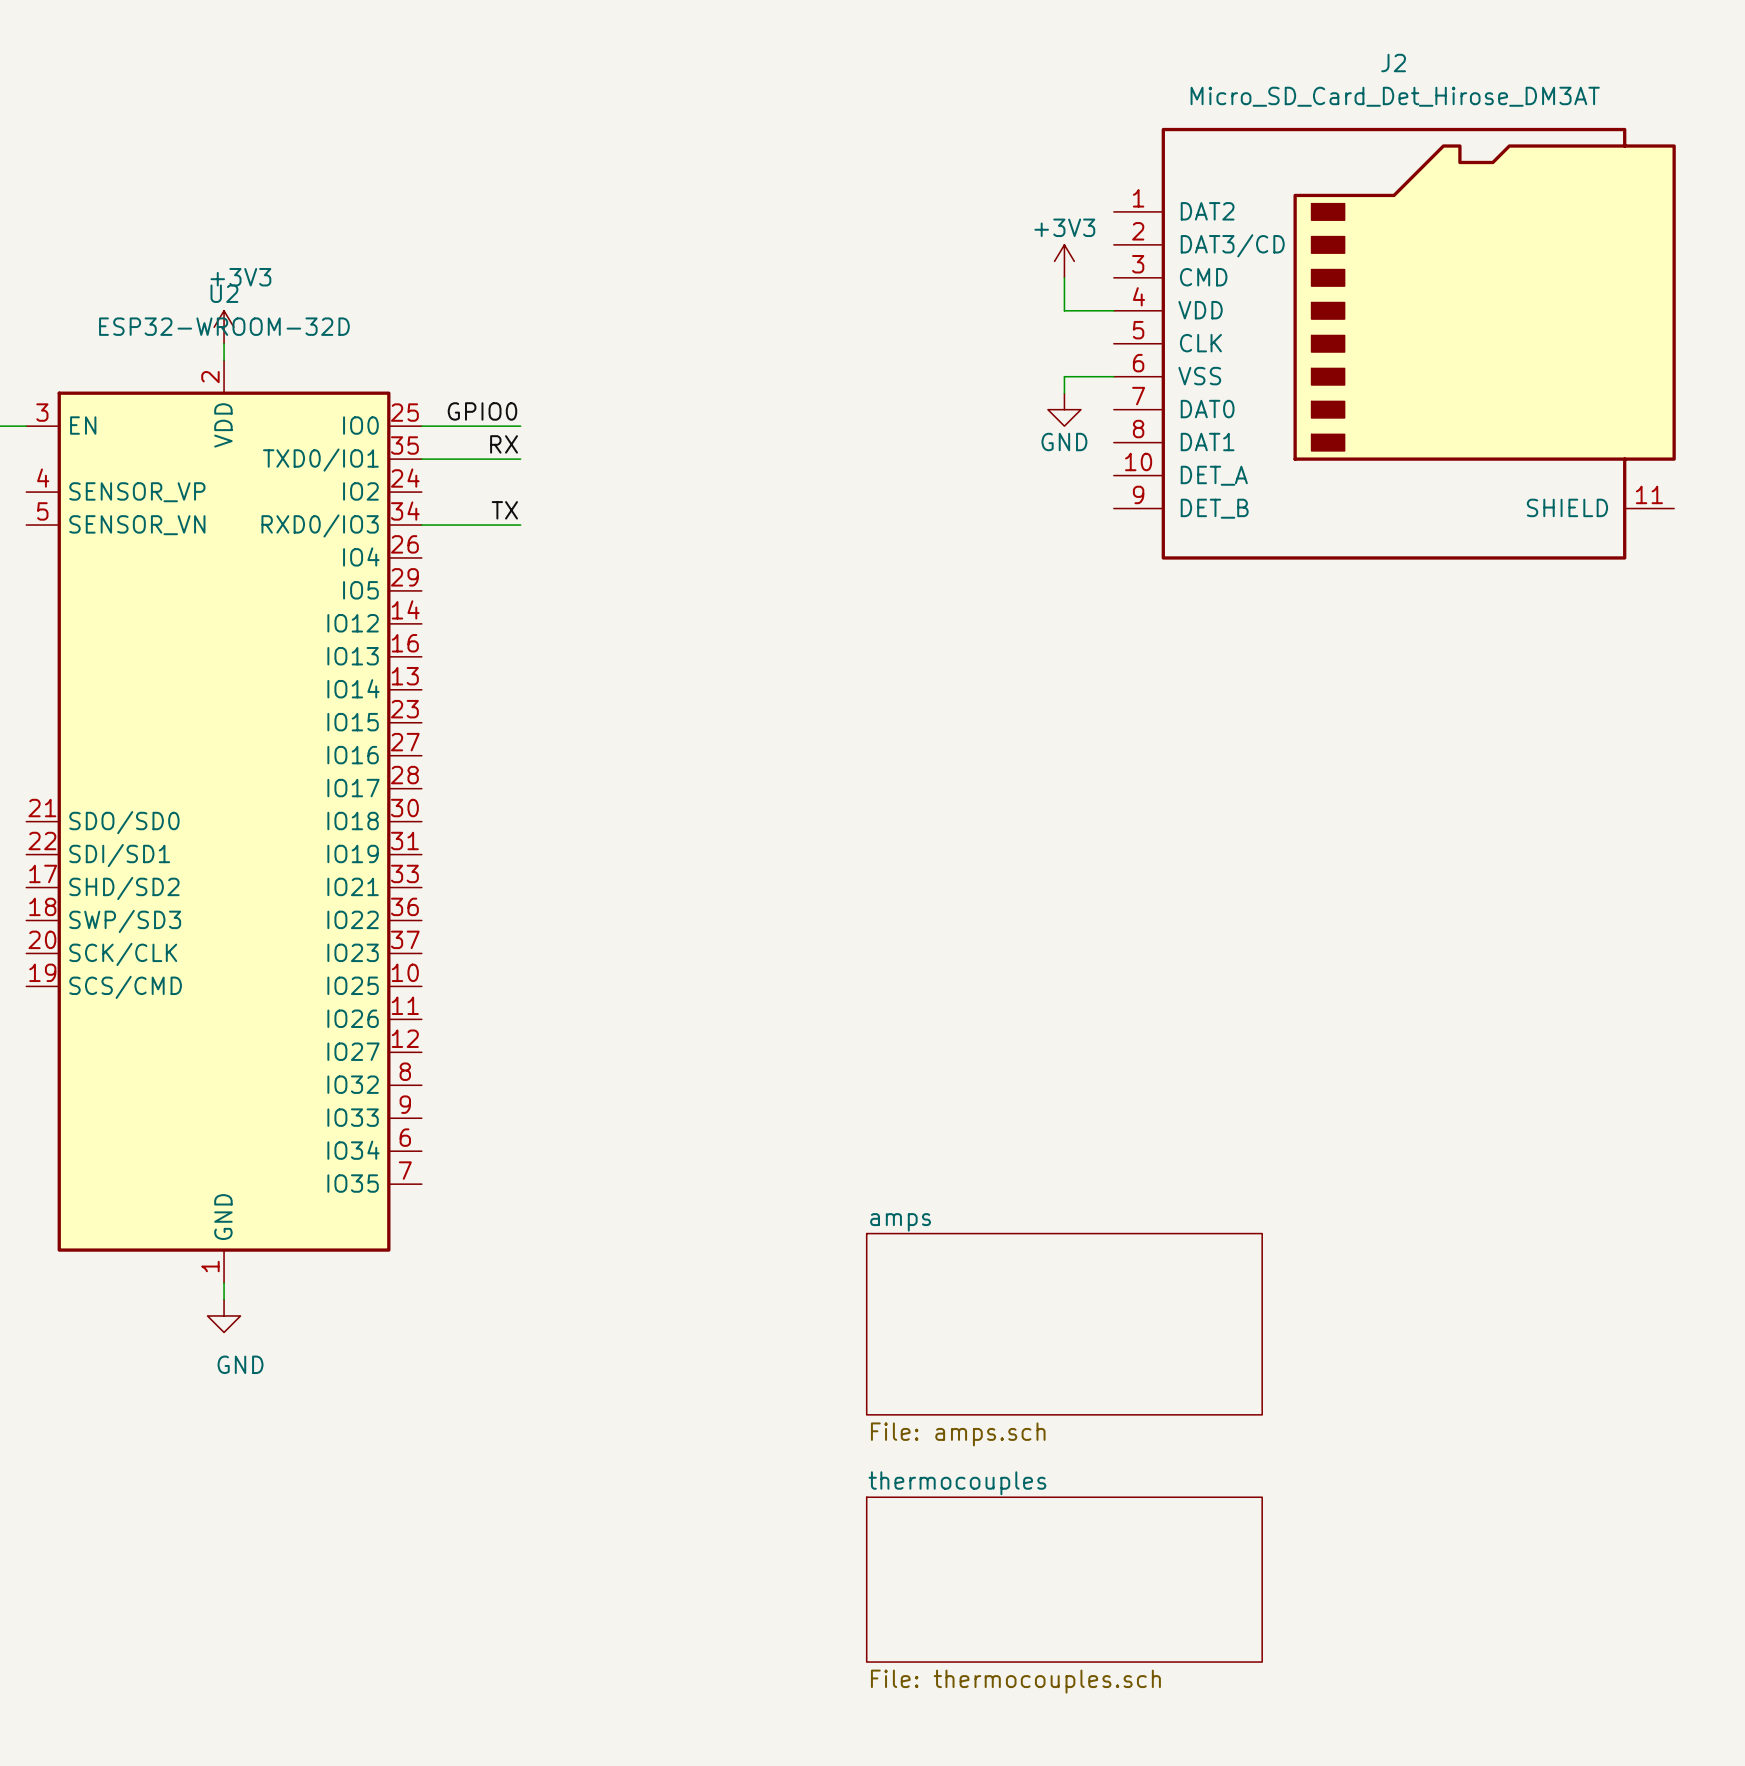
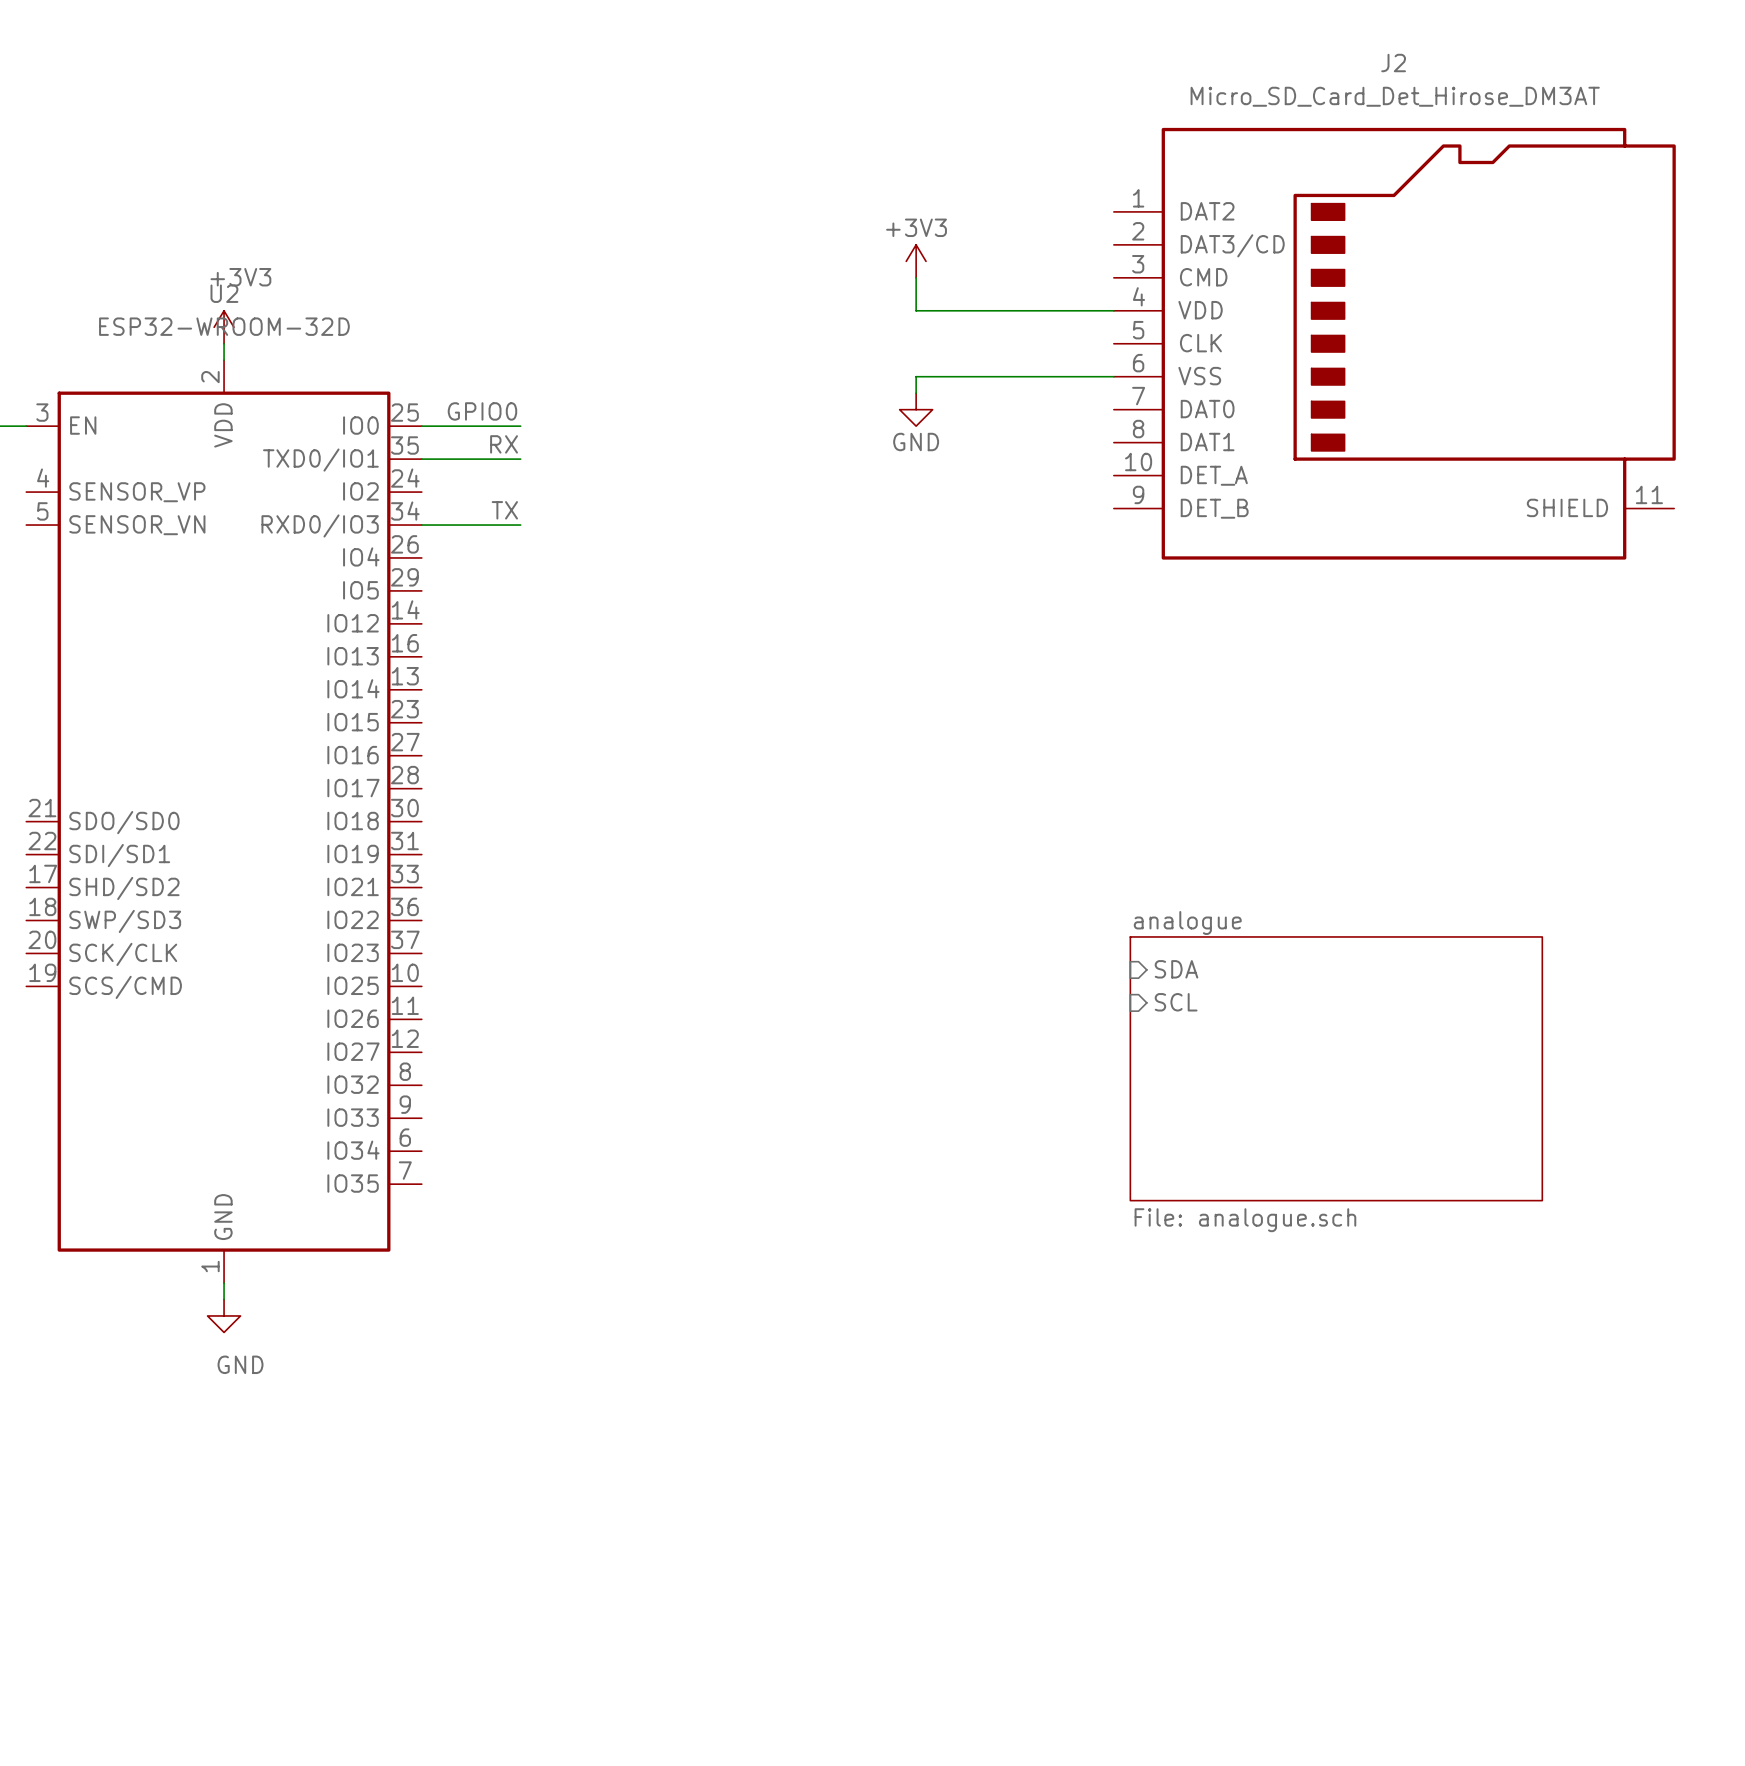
power symbol position: +3V3 (1064, 261) -> +3V3 (916, 261)
wire: (1064, 277) (1064, 310) -> (916, 277) (916, 310) (1064, 310)
wire: (1064, 376) (1064, 393) -> (1064, 376) (916, 376) (916, 393)
power symbol position: GND (1064, 409) -> GND (916, 409)
sheet pin: none -> SDA (1176, 969)
sheet pin: none -> SCL (1176, 1002)
sheet analogue: none -> File: analogue.sch (1336, 1068)
sheet amps: File: amps.sch (1064, 1324) -> none
sheet thermocouples: File: thermocouples.sch (1064, 1579) -> none

